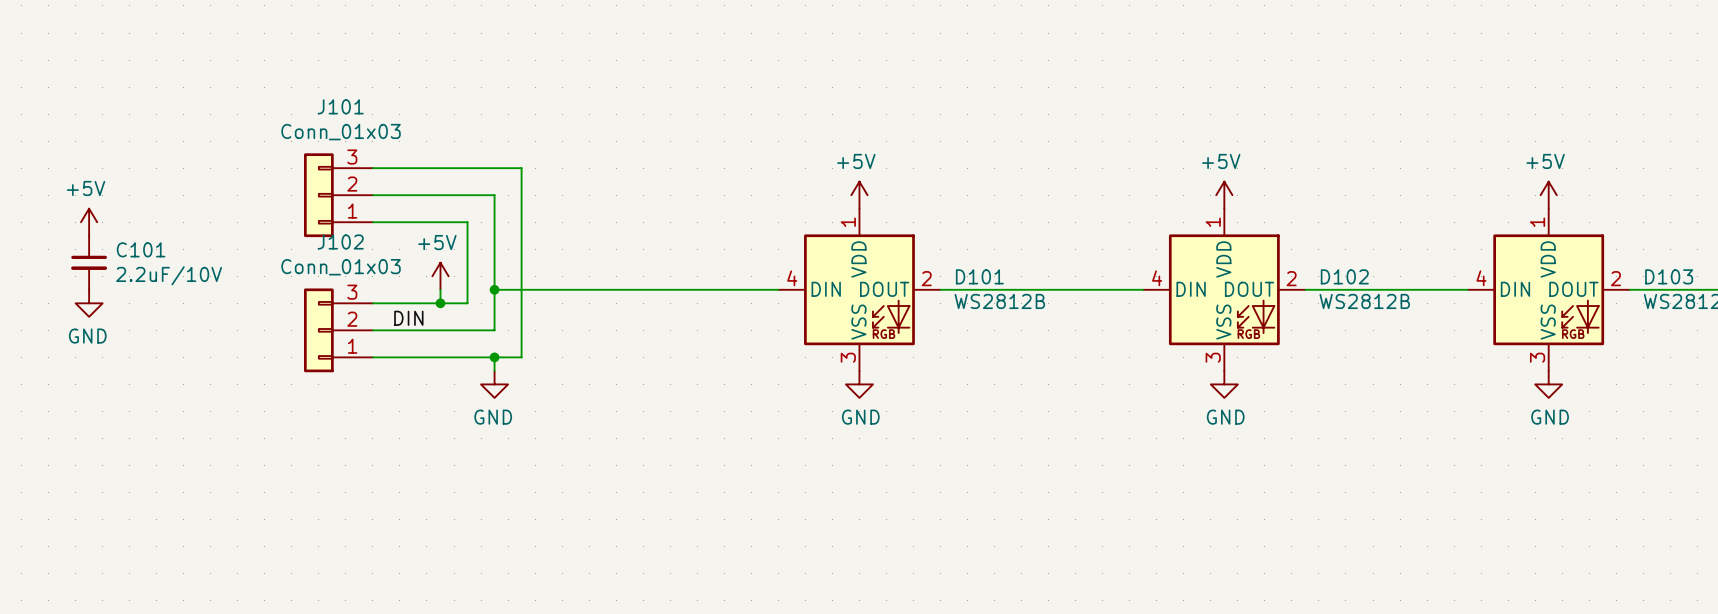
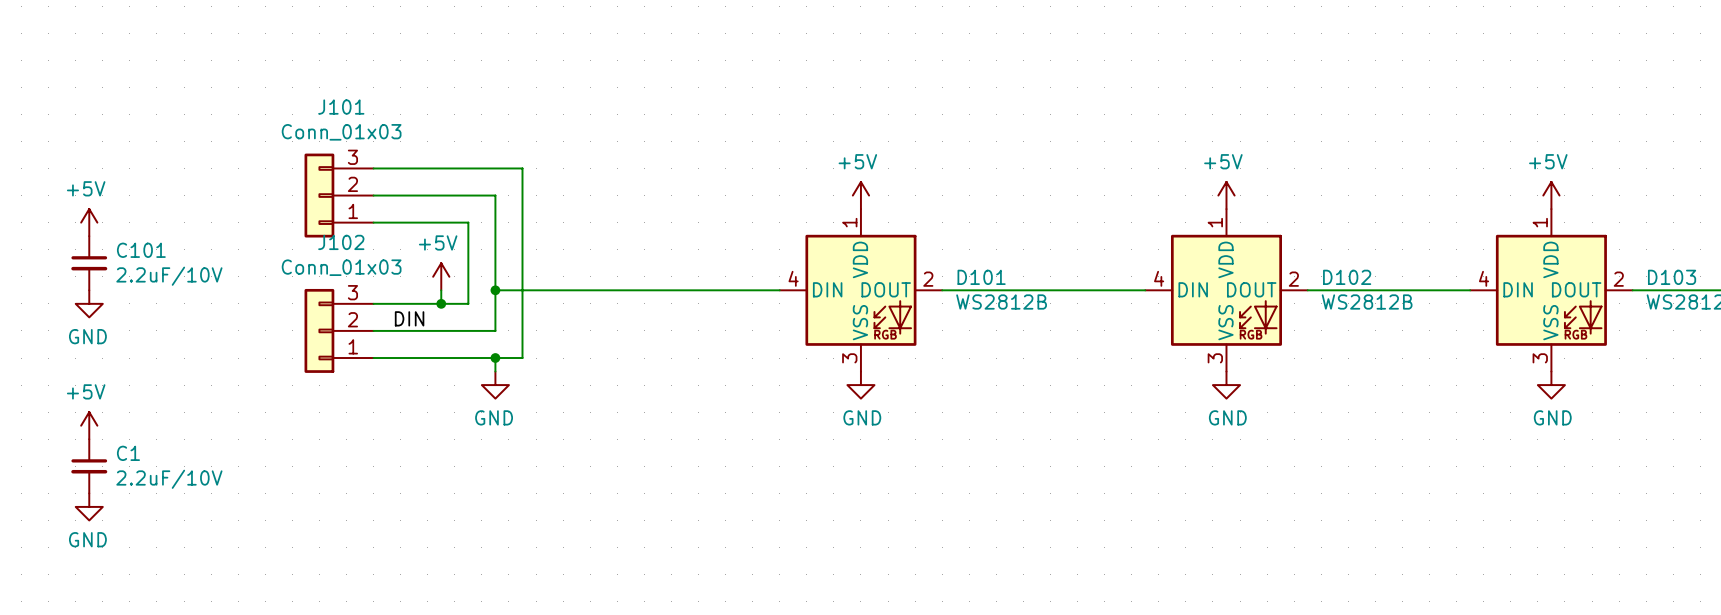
power symbol: none -> +5V (89, 425)
C1: none -> 2.2uF/10V (89, 466)
power symbol: none -> GND (89, 506)

